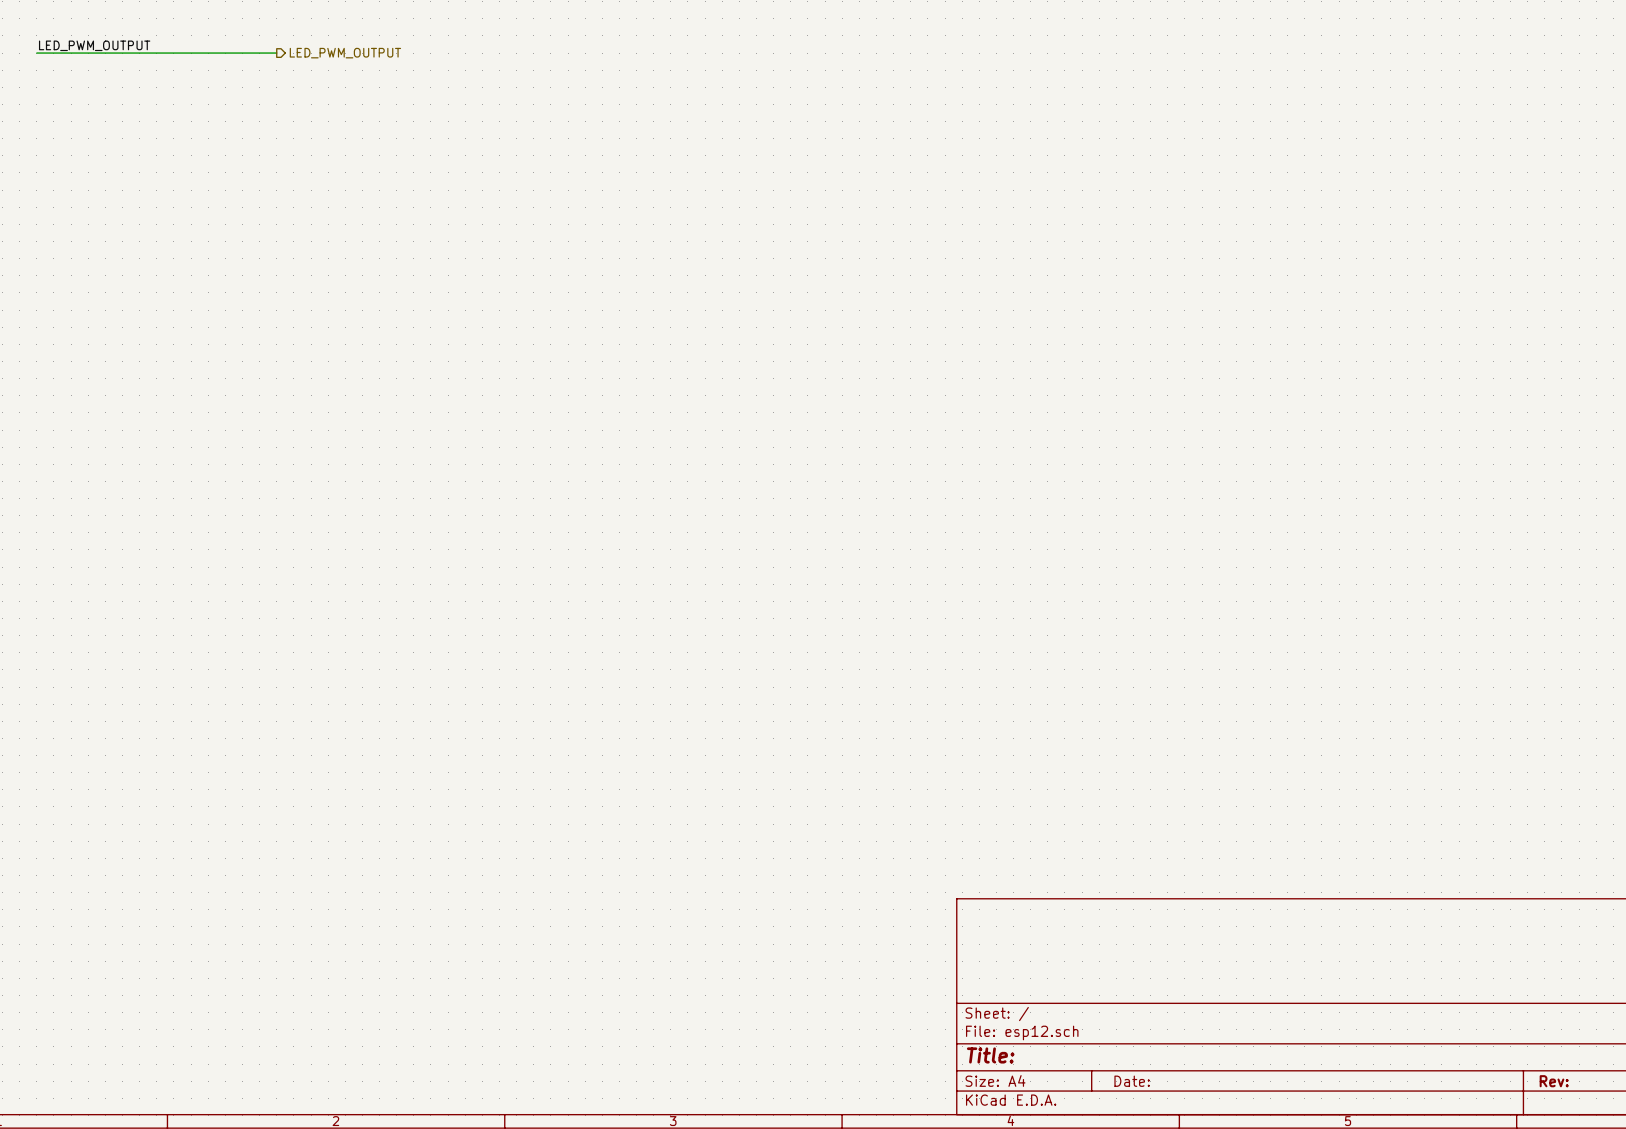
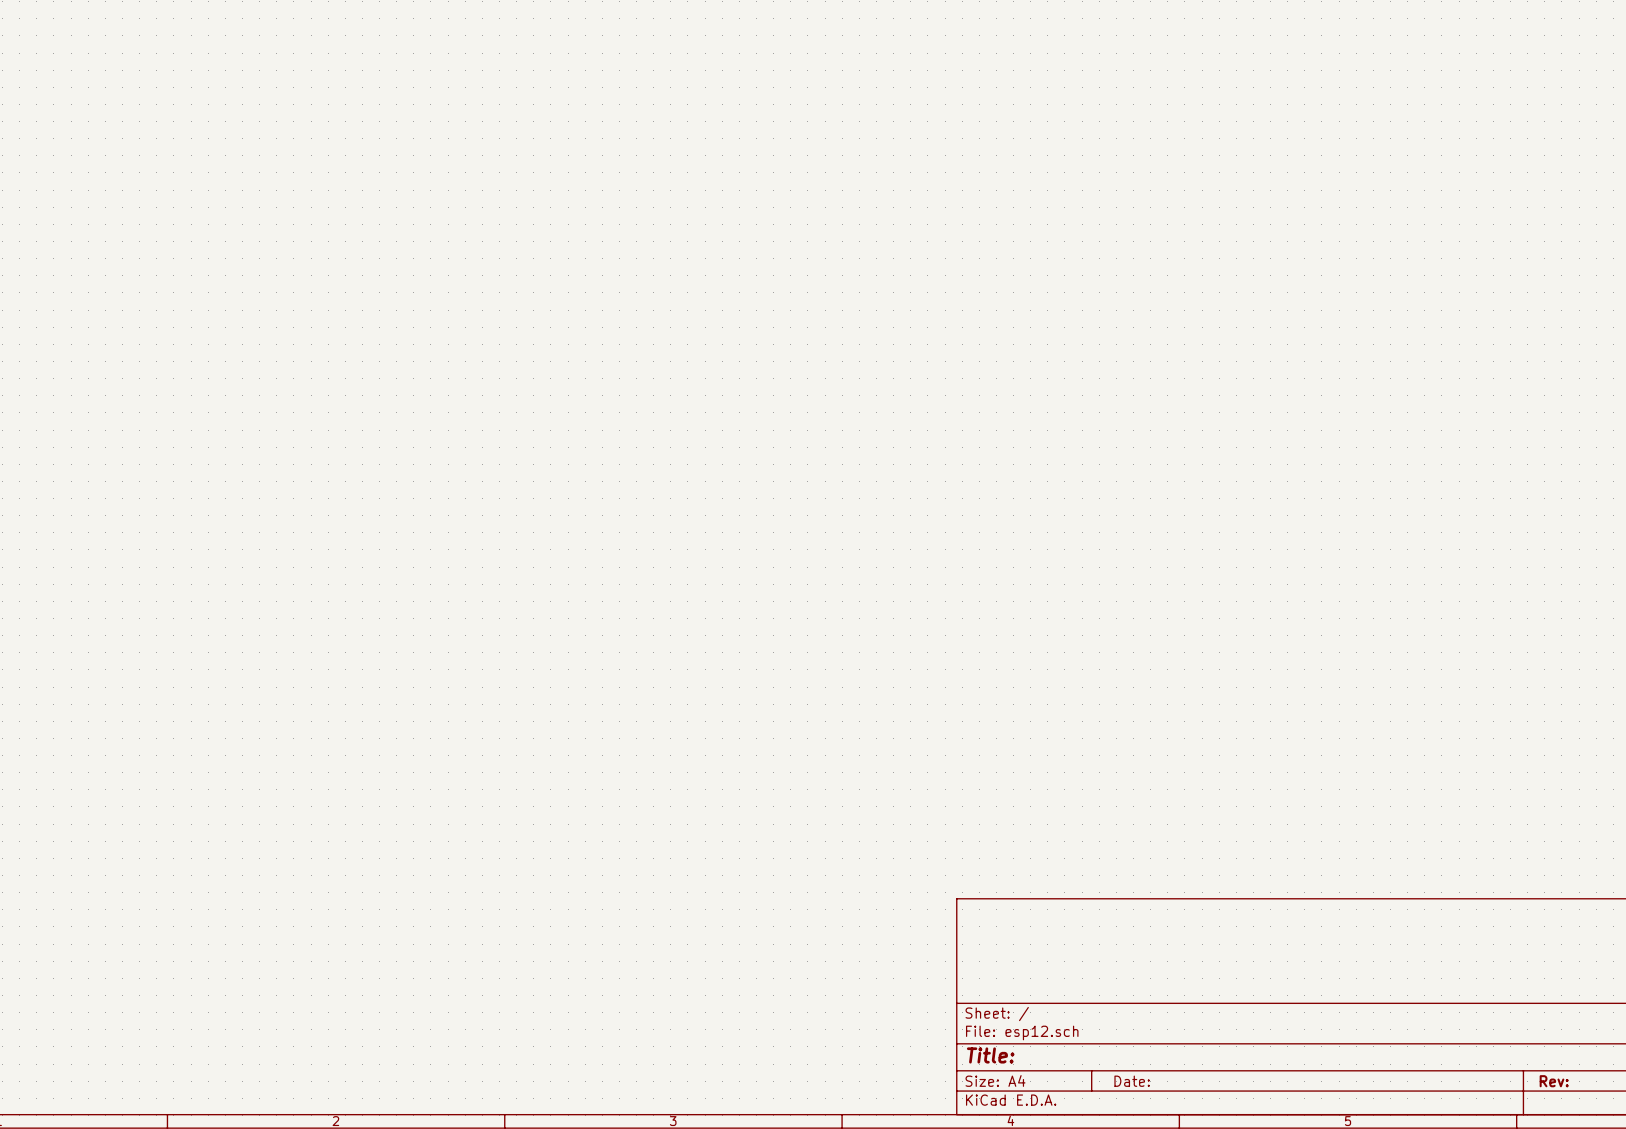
label: LED_PWM_OUTPUT (94, 45) -> none
wire: (36, 53) (276, 53) -> none
hierarchical label: LED_PWM_OUTPUT (345, 53) -> none

